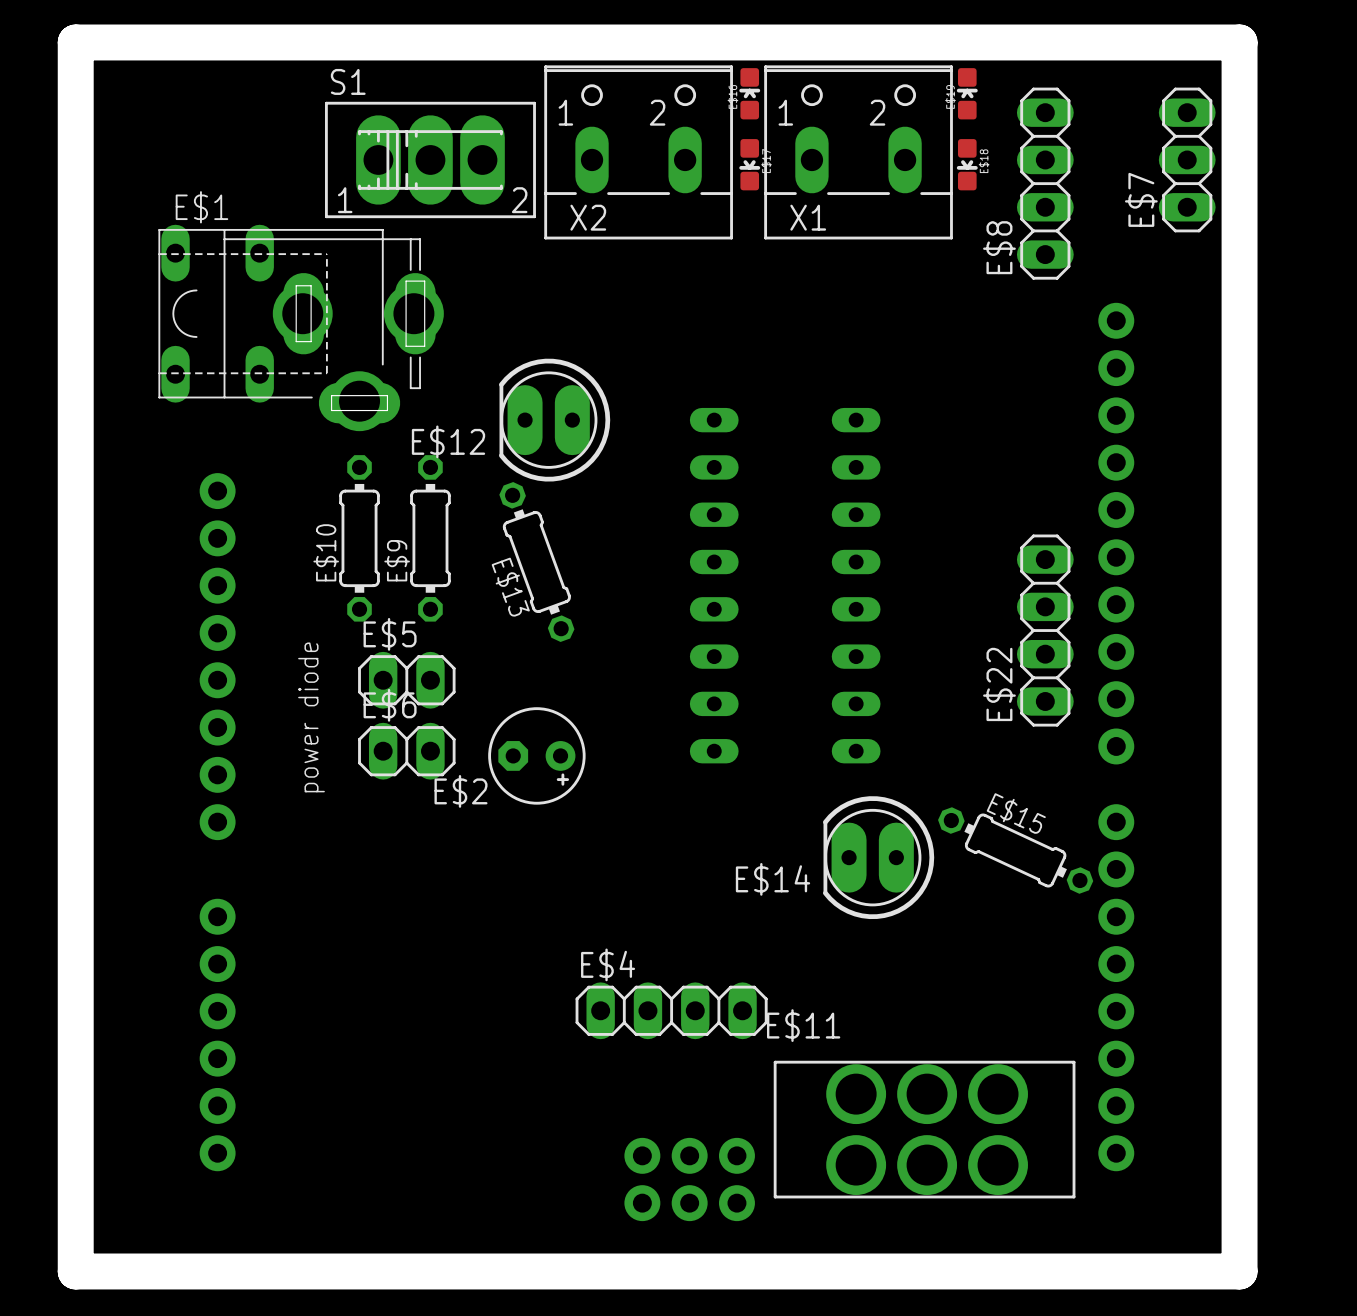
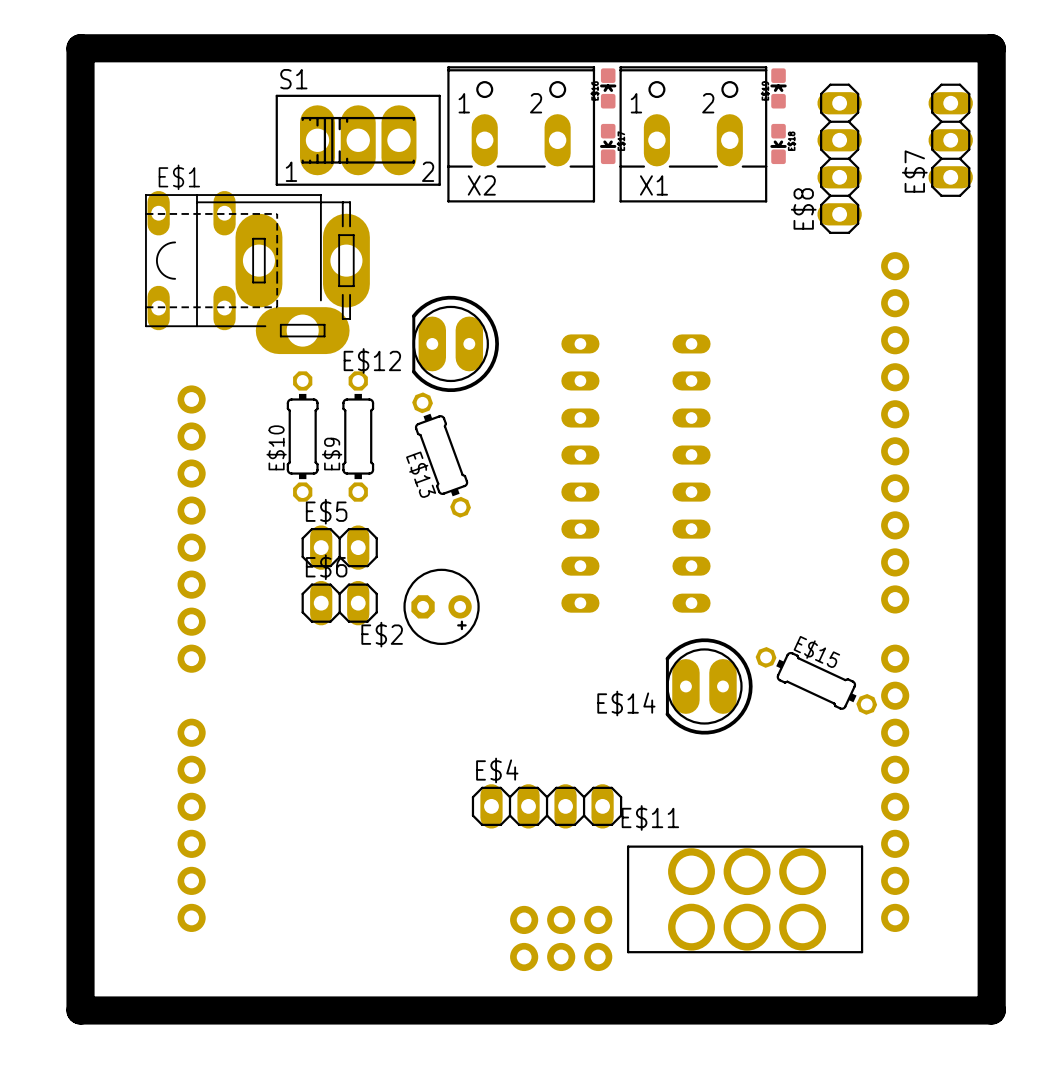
E$1 footprint: [158, 228, 444, 432] -> [145, 194, 370, 355]
E$22: (1045, 630) -> none
text: power diode (311, 717) -> none

